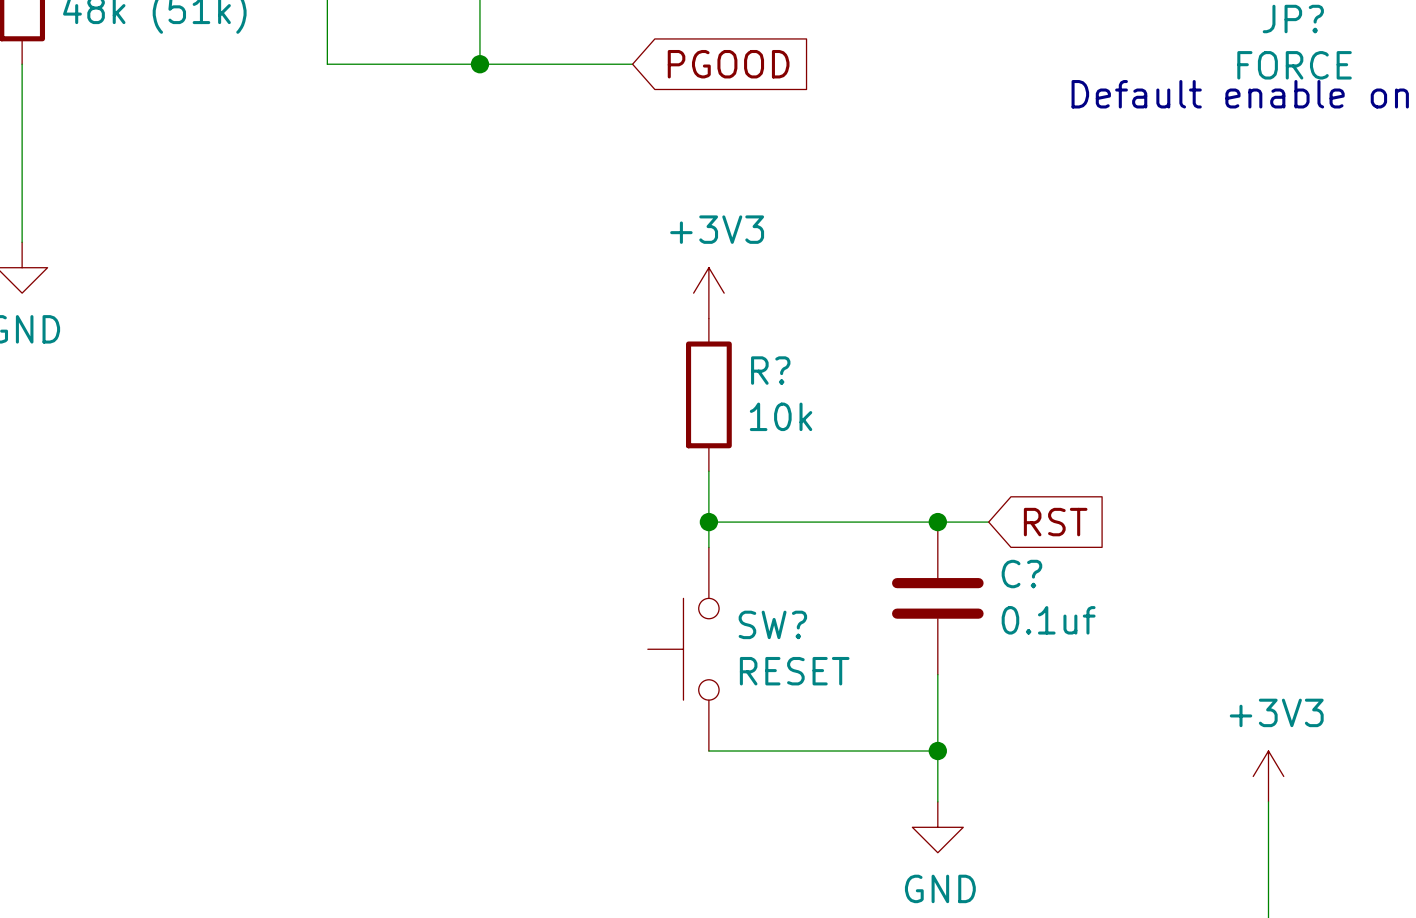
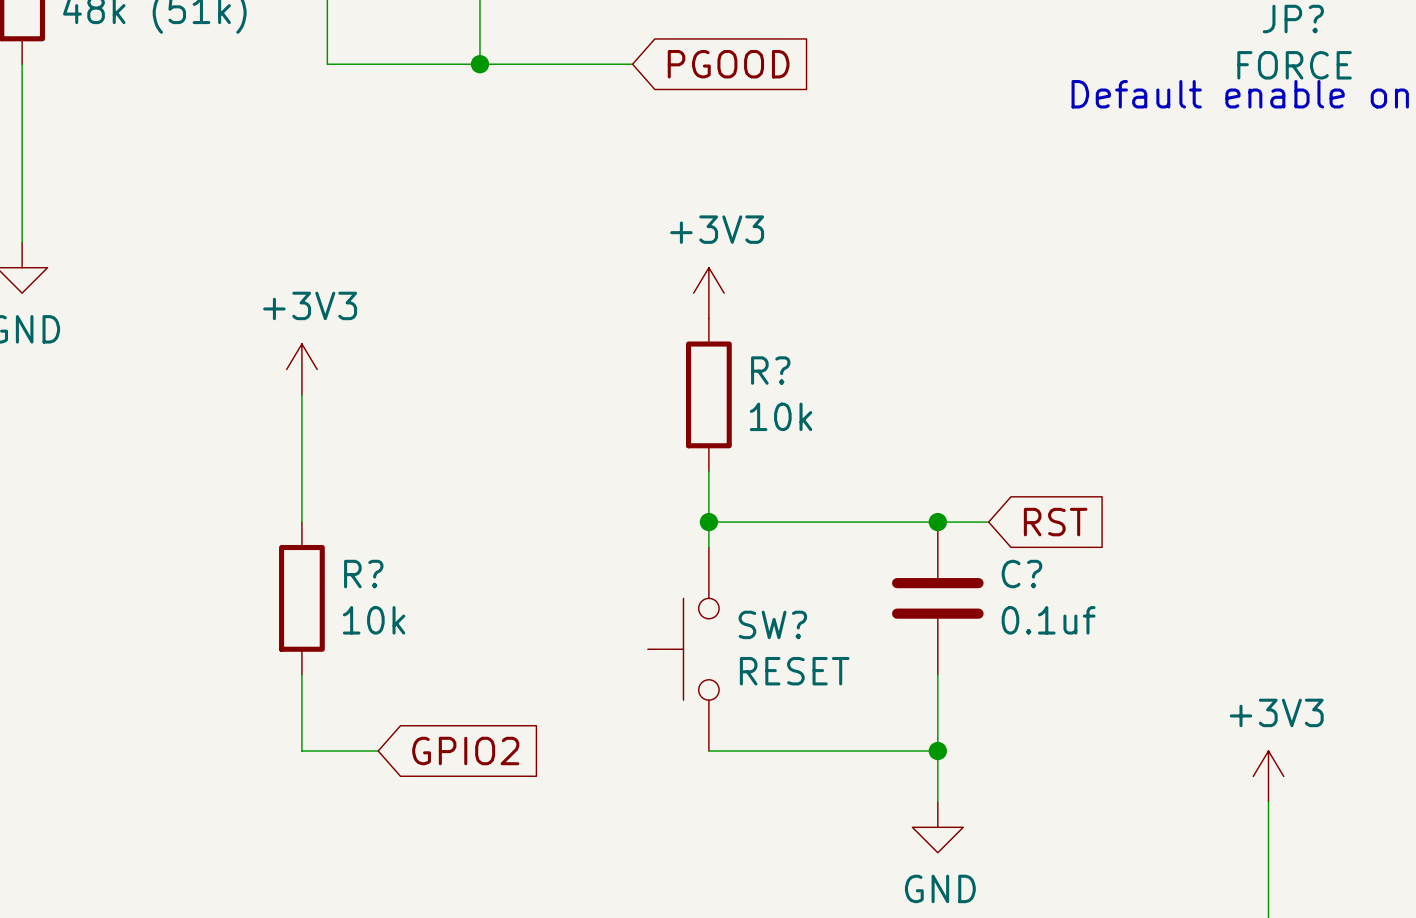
power symbol: none -> +3V3 (301, 369)
wire: none -> (301, 394) (301, 522)
R?: none -> 10k (301, 598)
wire: none -> (301, 674) (301, 751) (378, 751)
global label: none -> GPIO2 (465, 751)

